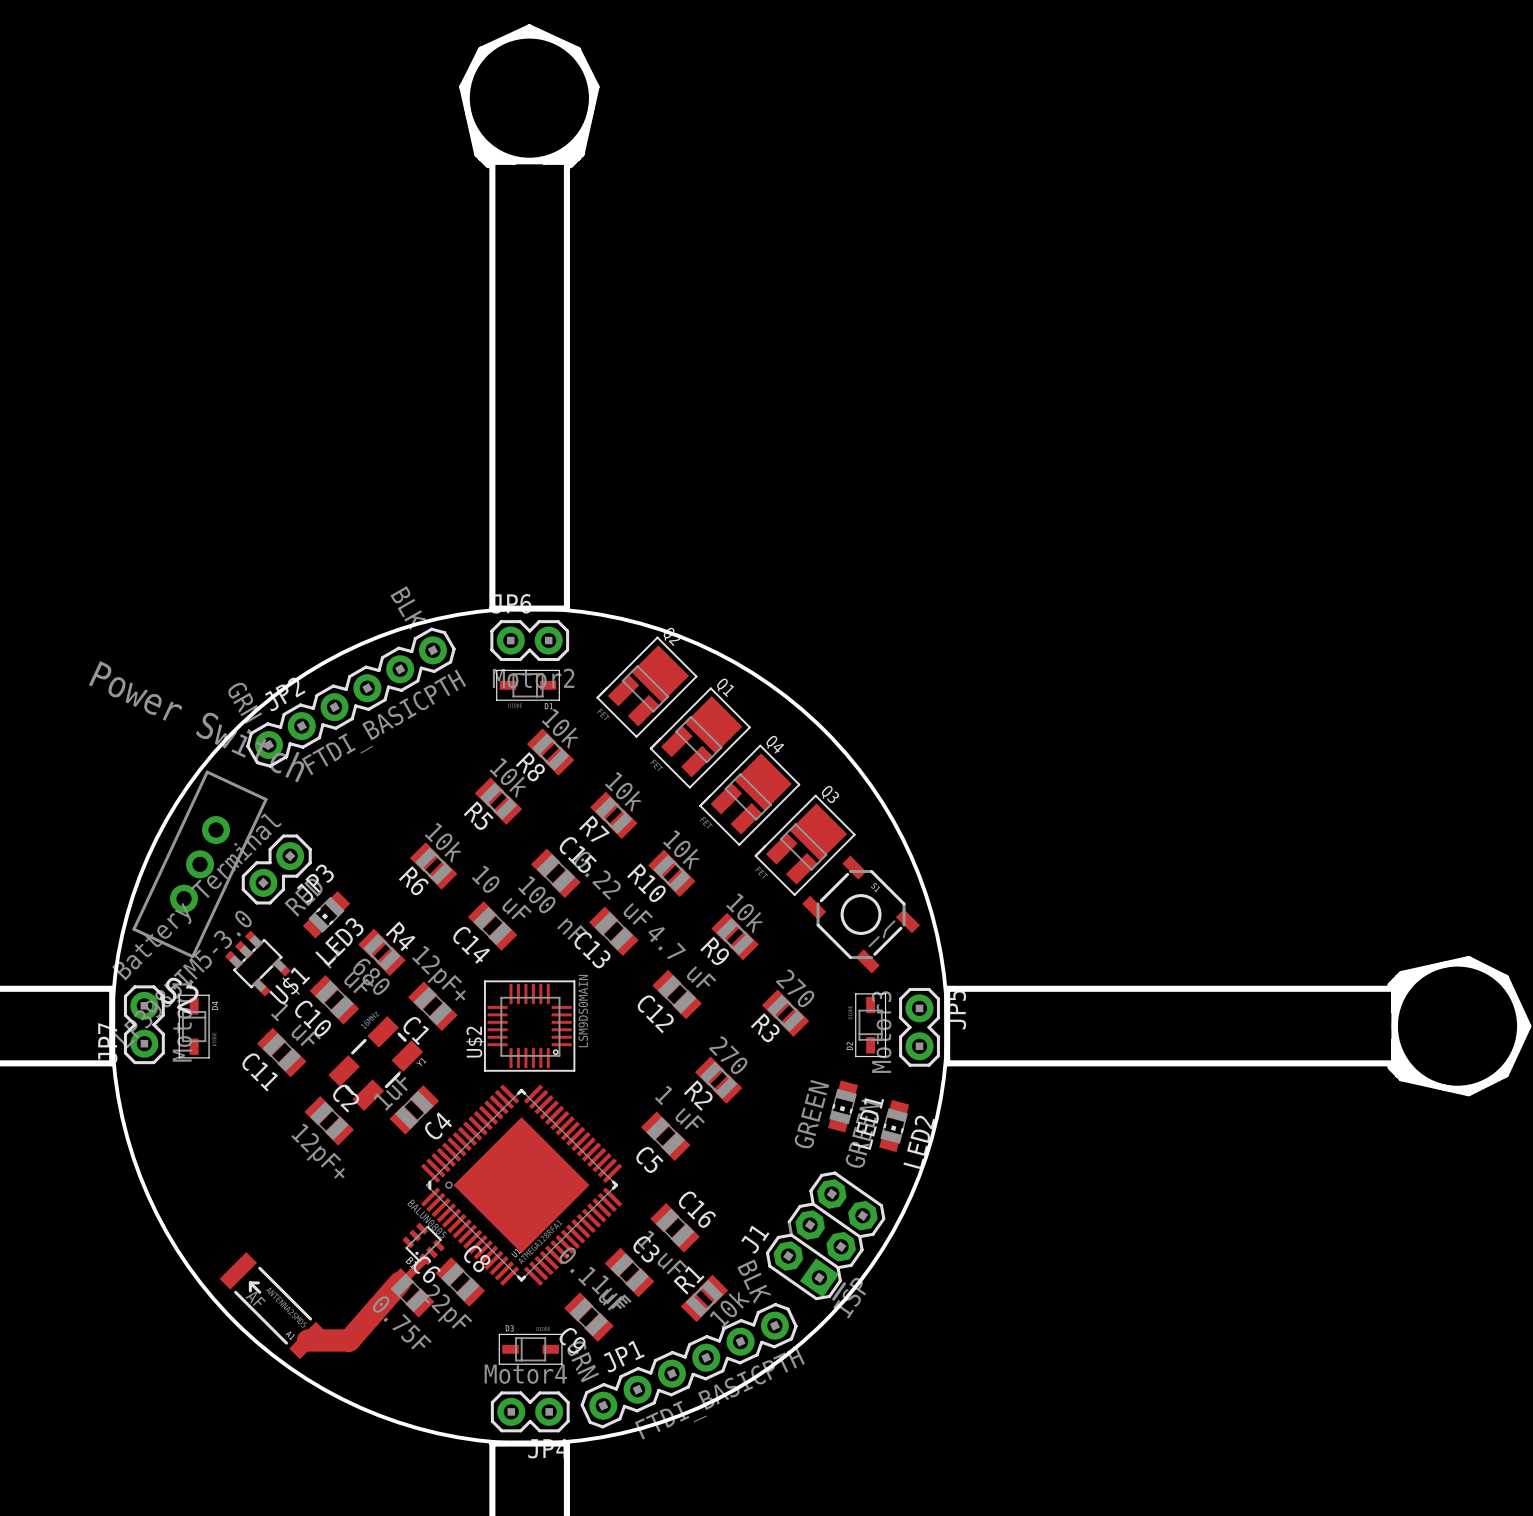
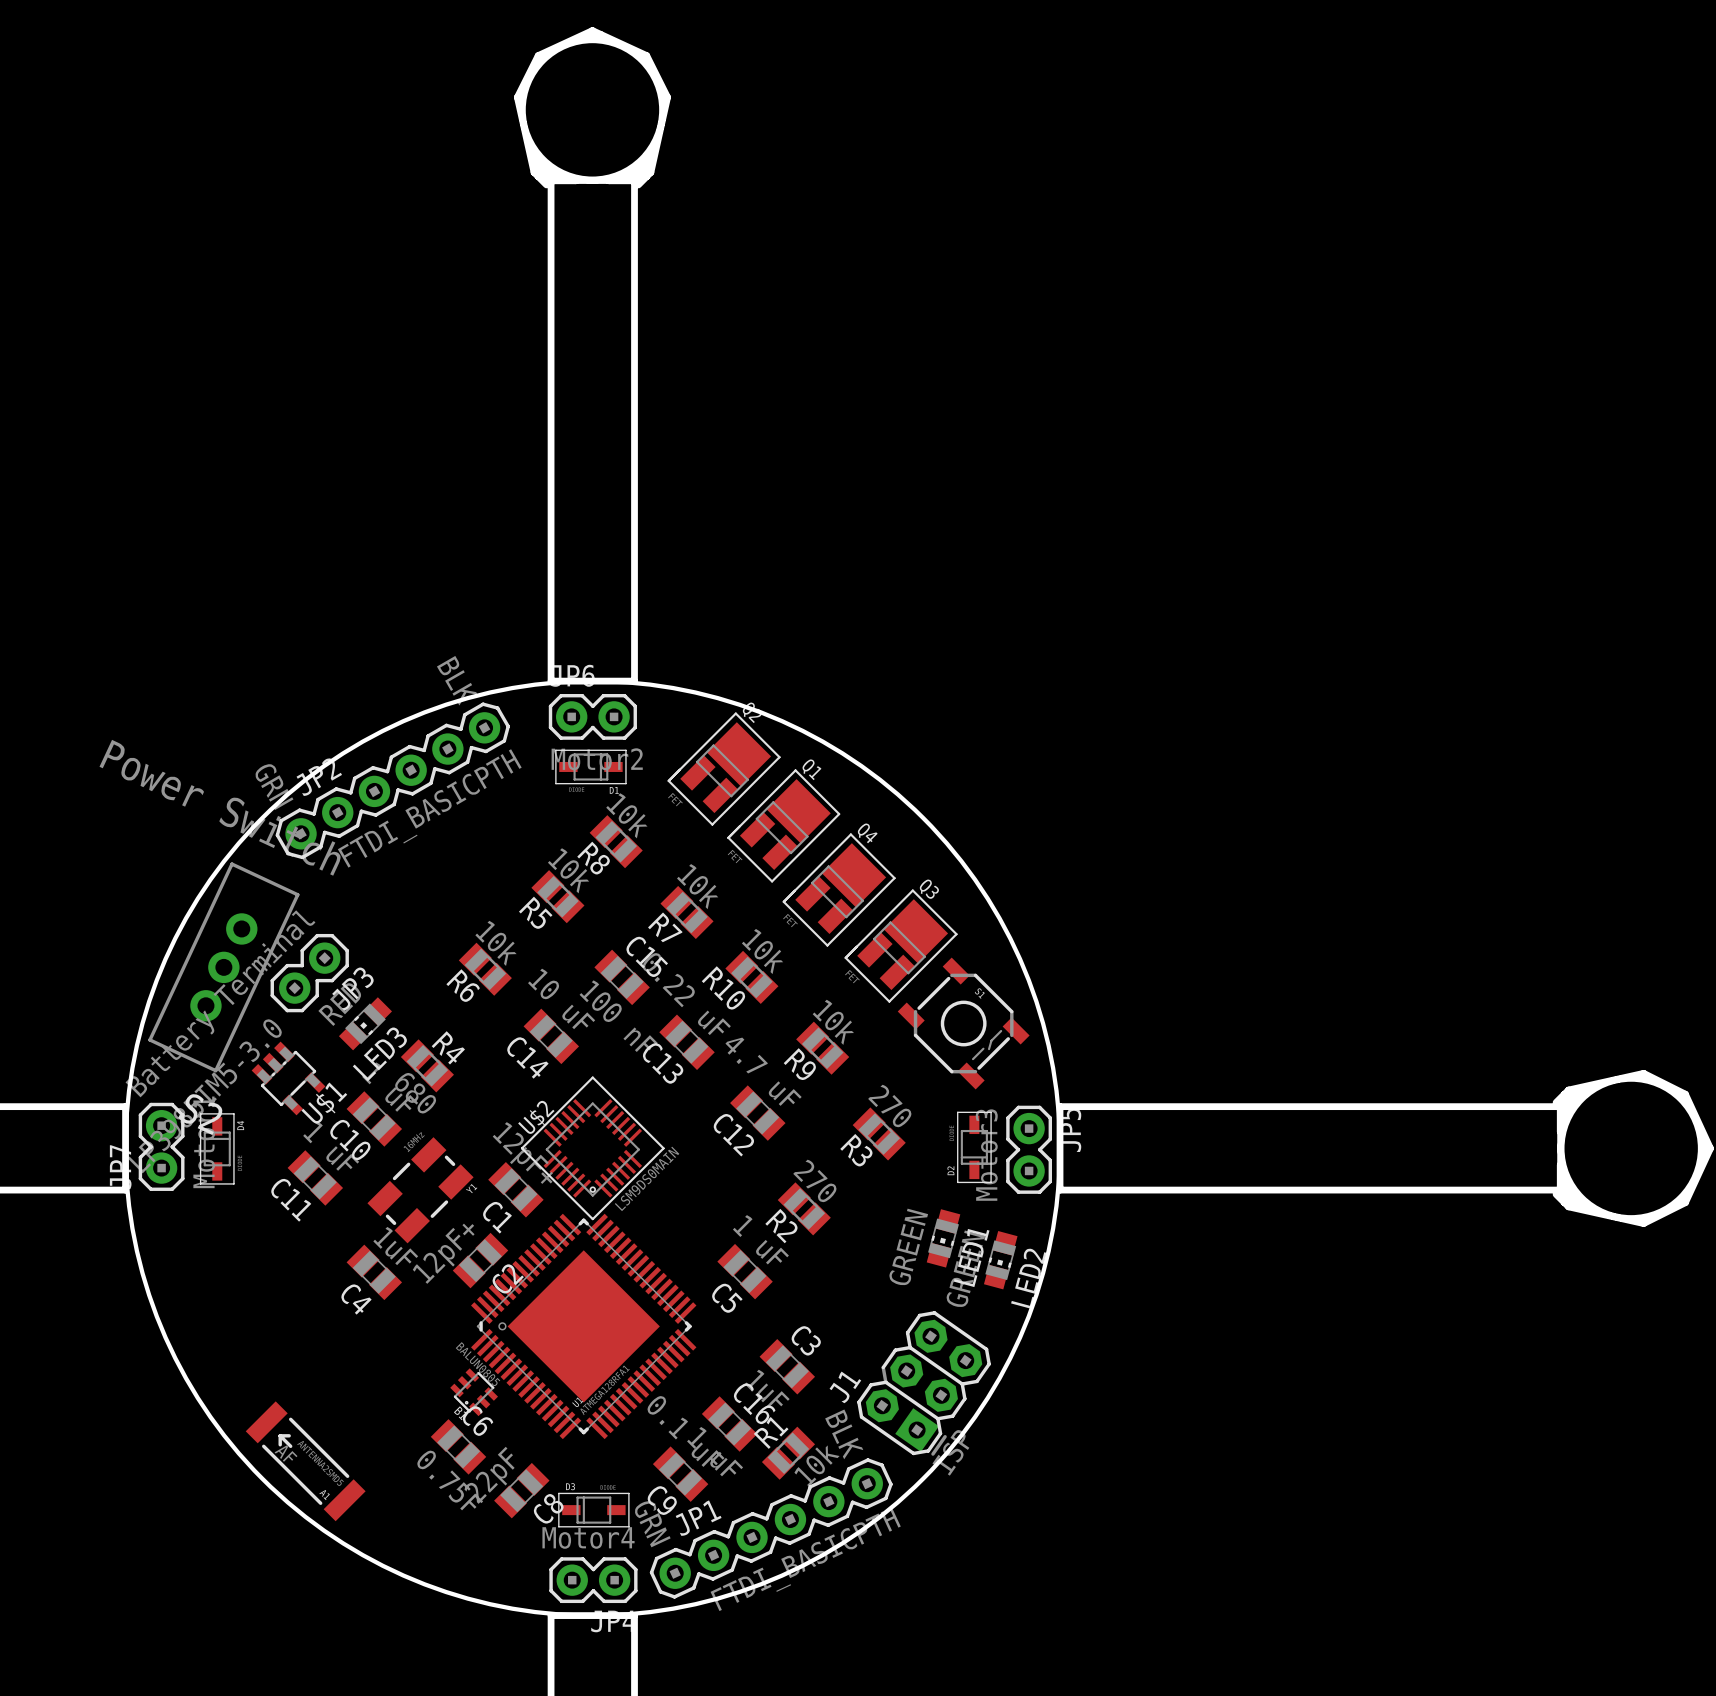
C1 position: (432, 1006) -> (515, 1189)
U$2 rotation: 0° (529, 1026) -> 45° clockwise (592, 1148)
C4 rotation: 0° (414, 1109) -> 90° clockwise (374, 1272)
C4 position: (414, 1109) -> (374, 1272)
C2 rotation: 0° (329, 1120) -> 90° clockwise (480, 1260)
C2 position: (329, 1120) -> (480, 1260)
C16 position: (675, 1227) -> (729, 1423)
track: (425, 1259) (399, 1282) (349, 1340) (307, 1340) -> none
C3 position: (629, 1272) -> (787, 1366)
C8 rotation: 0° (460, 1281) -> 90° clockwise (521, 1490)
C8 position: (460, 1281) -> (521, 1490)
C9 position: (588, 1317) -> (680, 1474)

